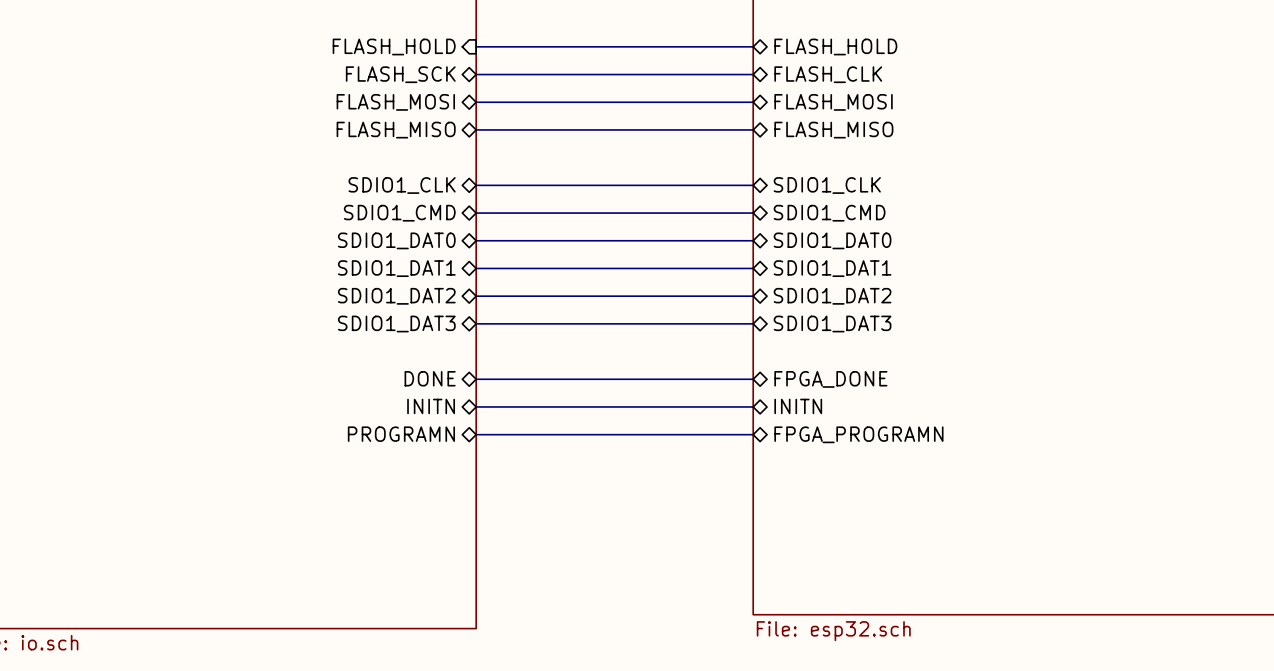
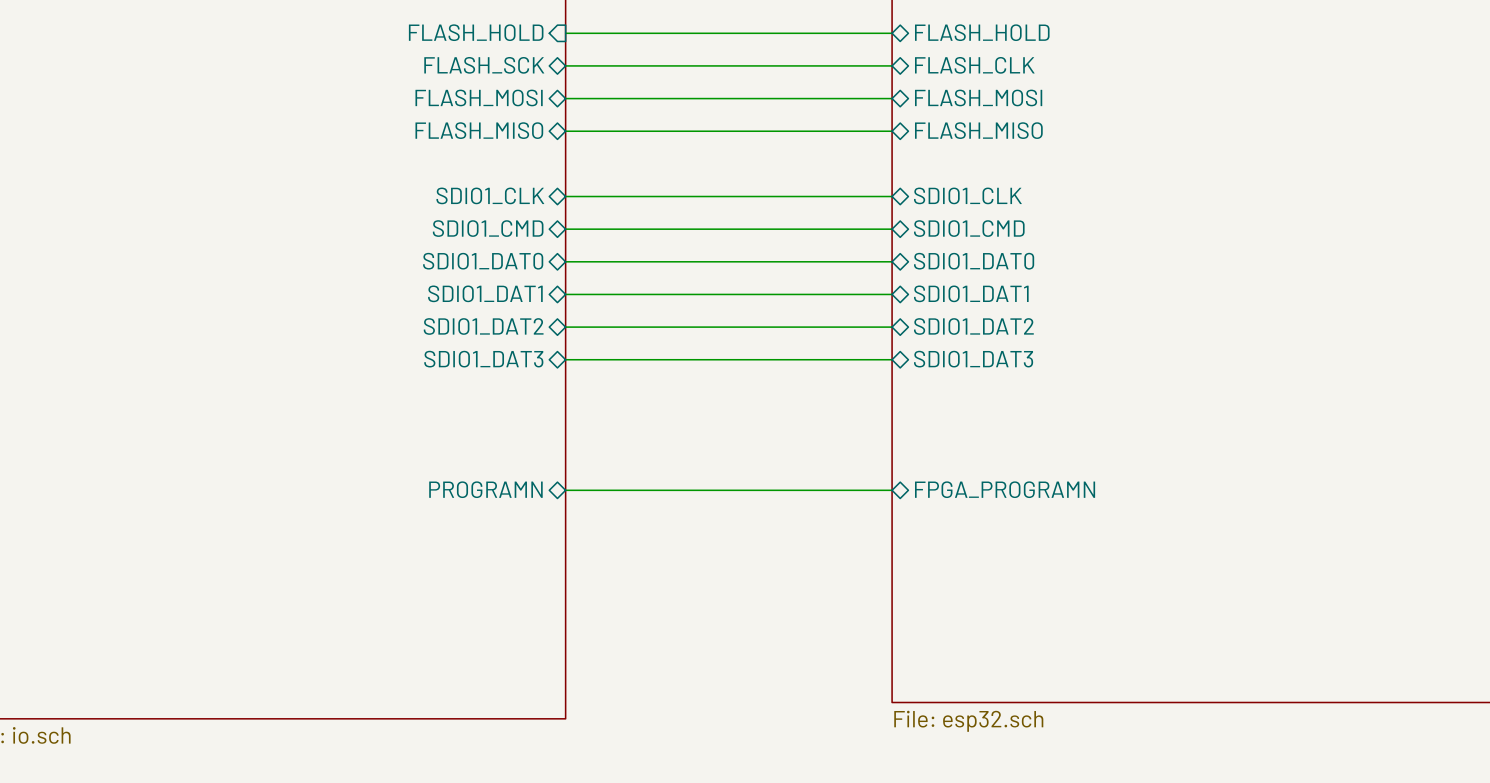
sheet pin: DONE (430, 378) -> none
wire: (476, 379) (753, 379) -> none
sheet pin: FPGA_DONE (830, 379) -> none
sheet pin: INITN (431, 406) -> none
wire: (476, 406) (753, 406) -> none
sheet pin: INITN (798, 406) -> none

